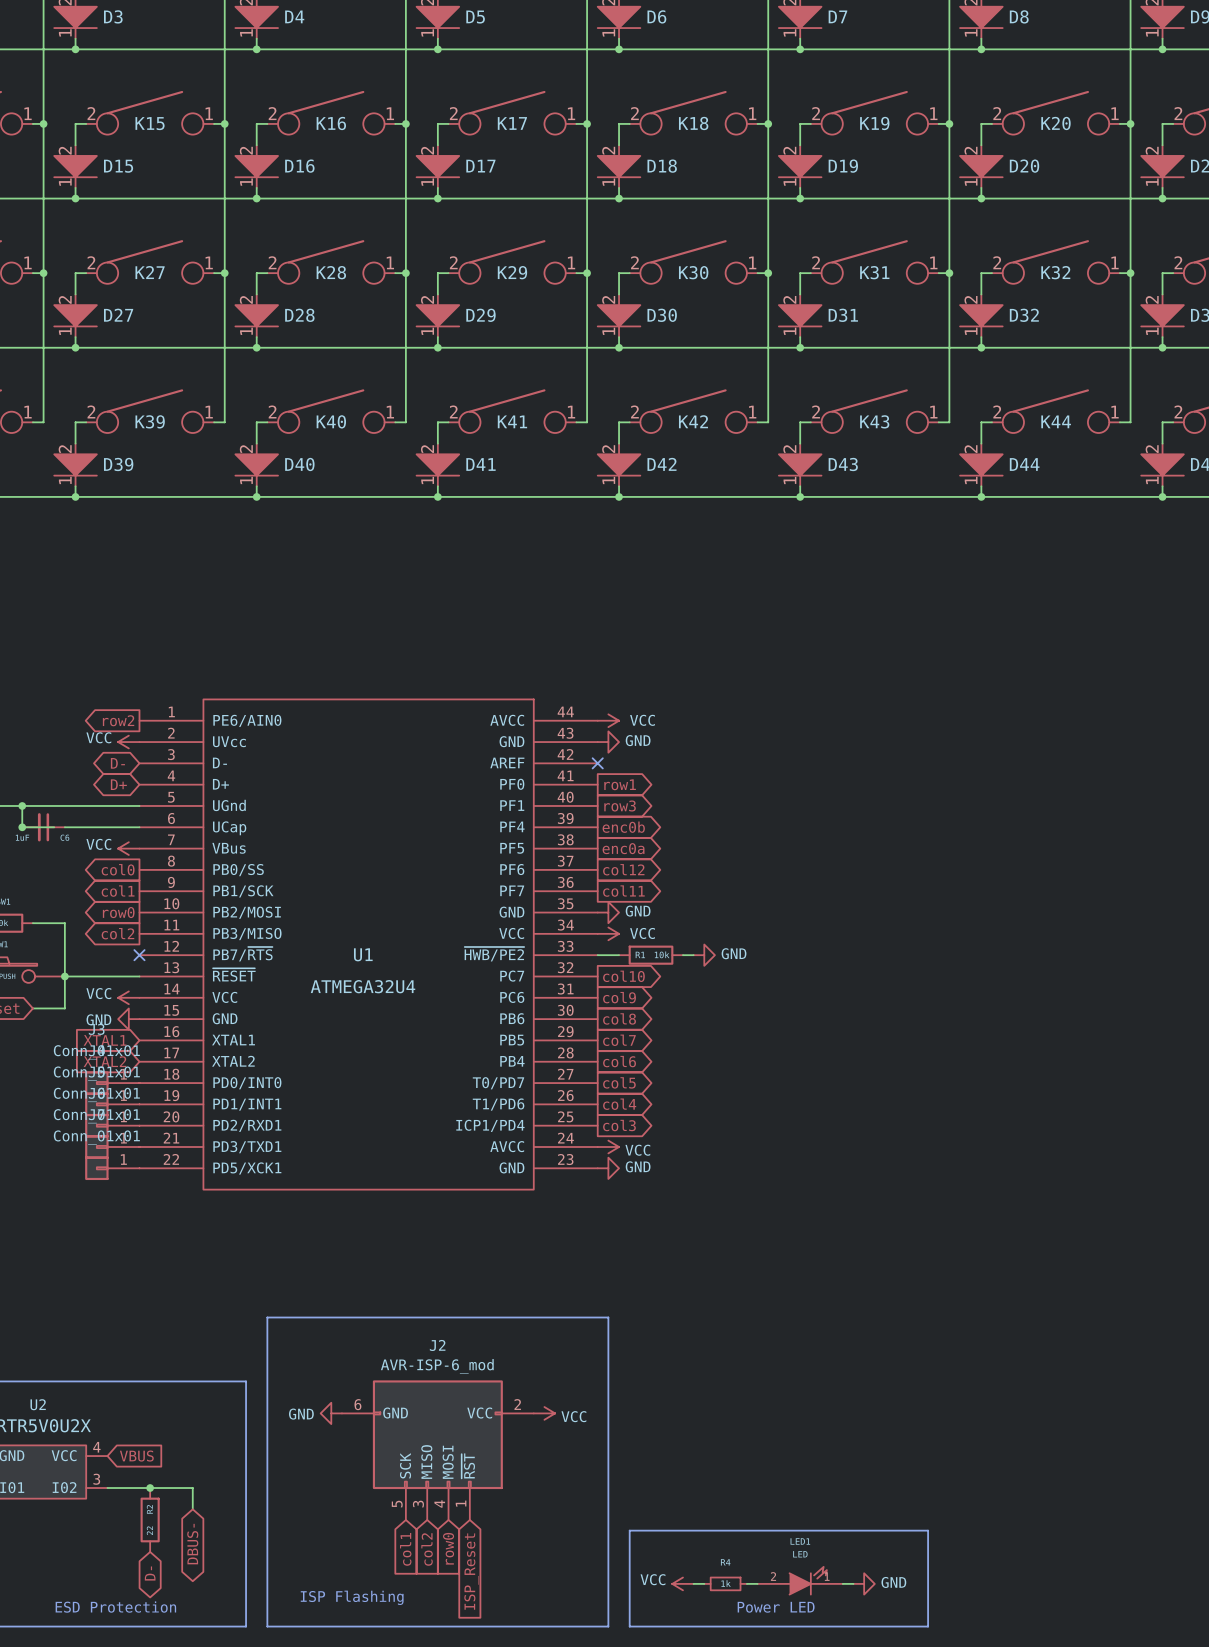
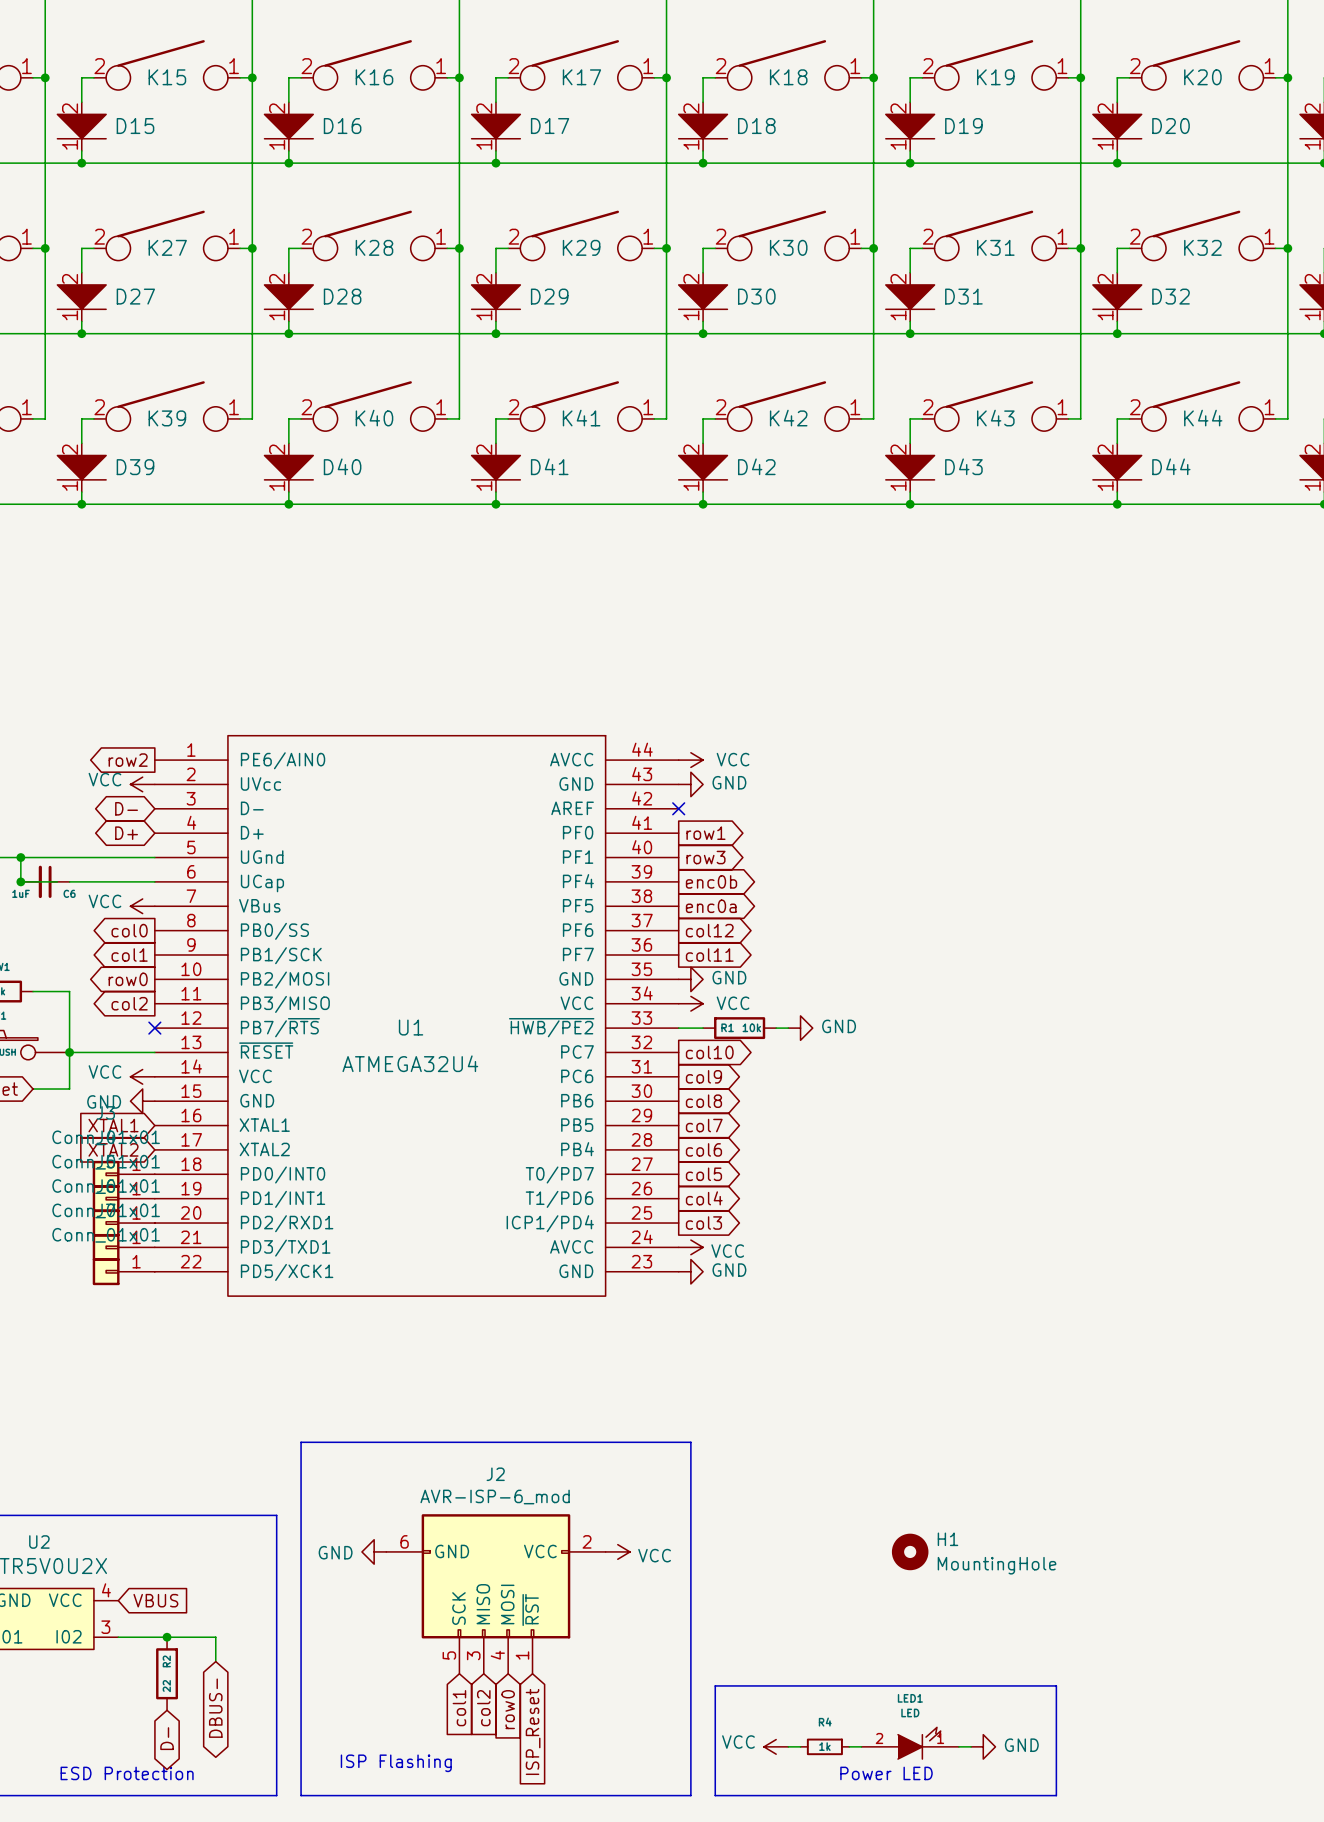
H1: none -> MountingHole (910, 1551)

